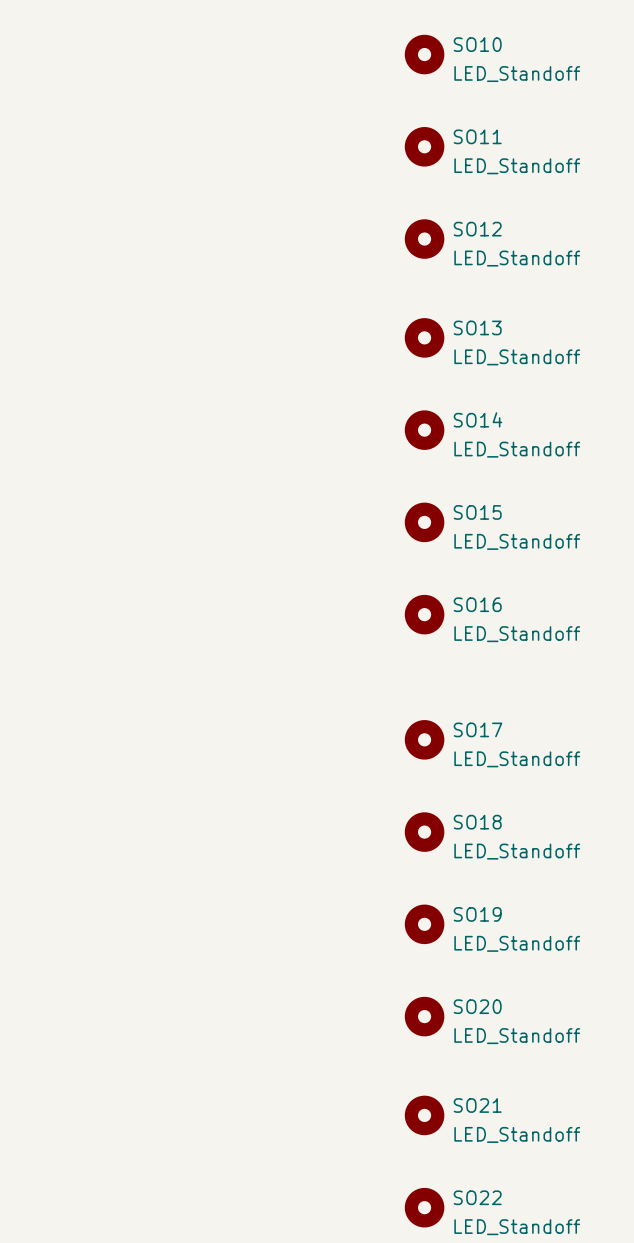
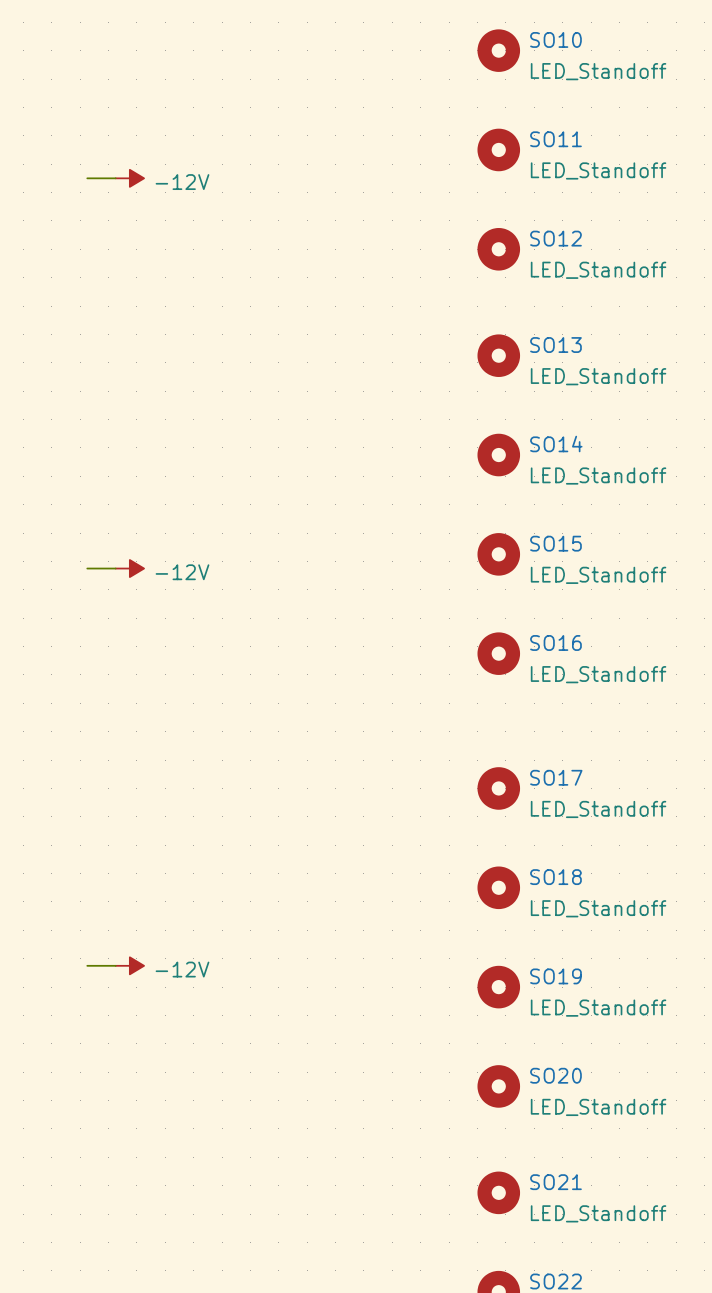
wire: none -> (87, 178) (115, 178)
power symbol: none -> -12V (129, 178)
wire: none -> (87, 568) (115, 568)
power symbol: none -> -12V (129, 568)
wire: none -> (87, 965) (115, 965)
power symbol: none -> -12V (129, 965)

